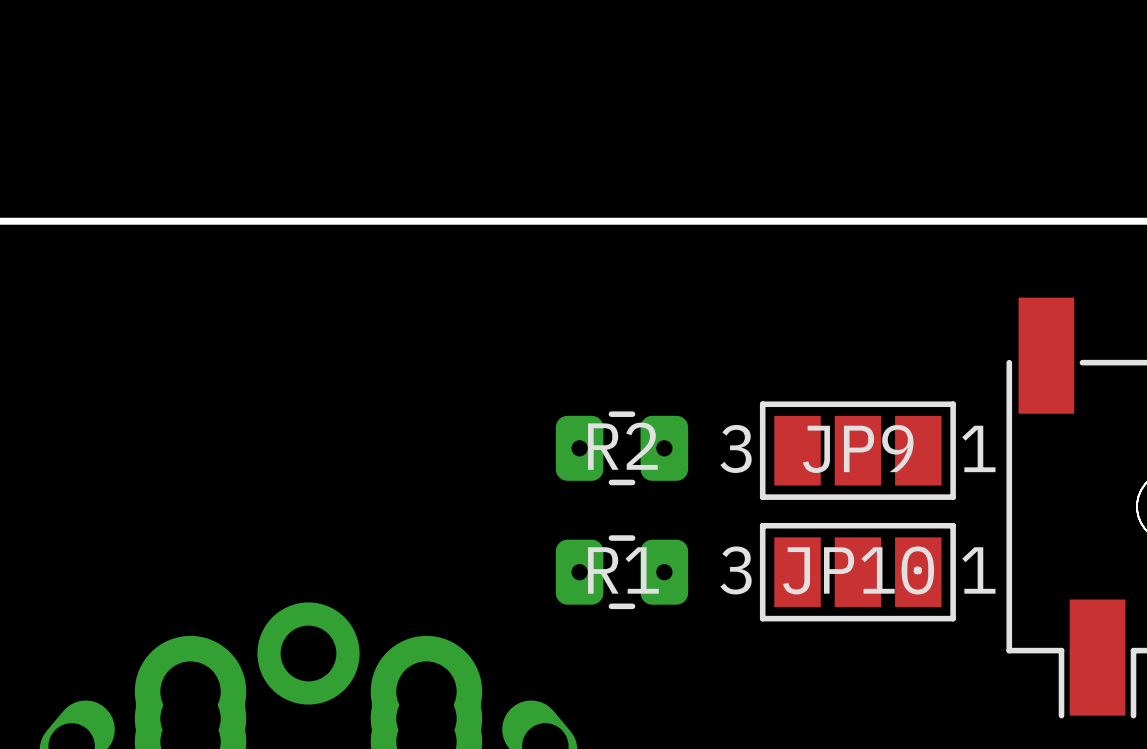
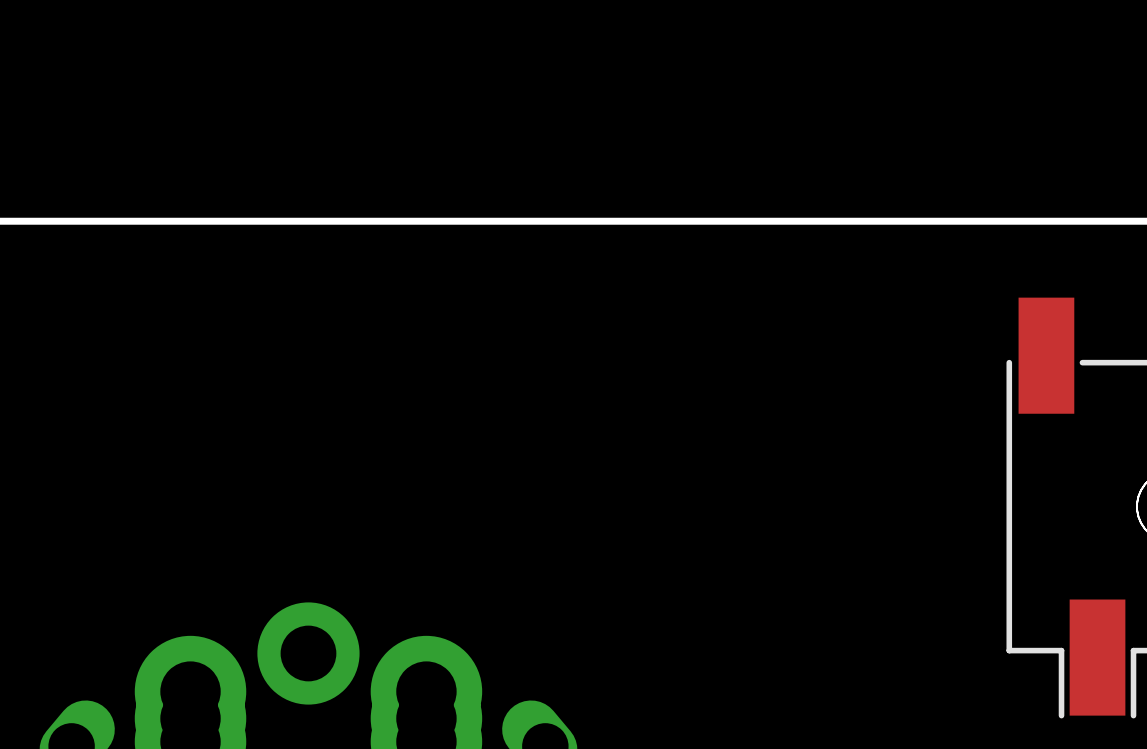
R2: (621, 448) -> none
JP9: (857, 450) -> none
R1: (621, 572) -> none
JP10: (857, 572) -> none

